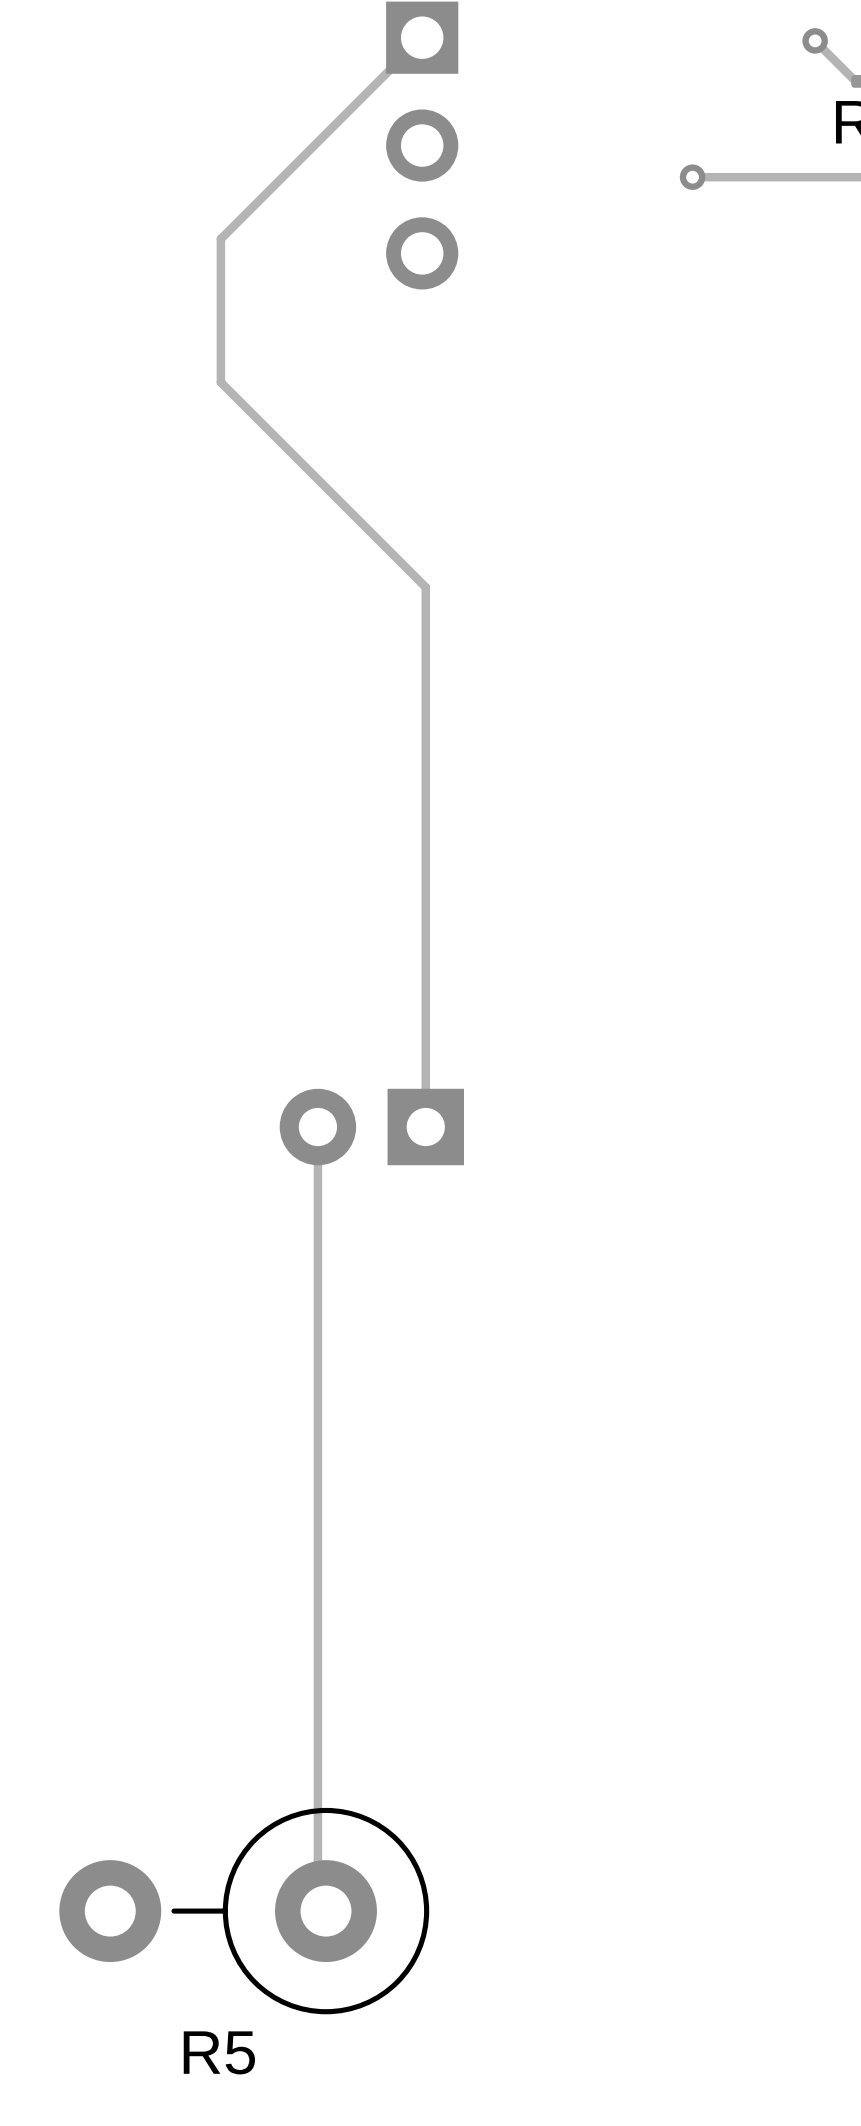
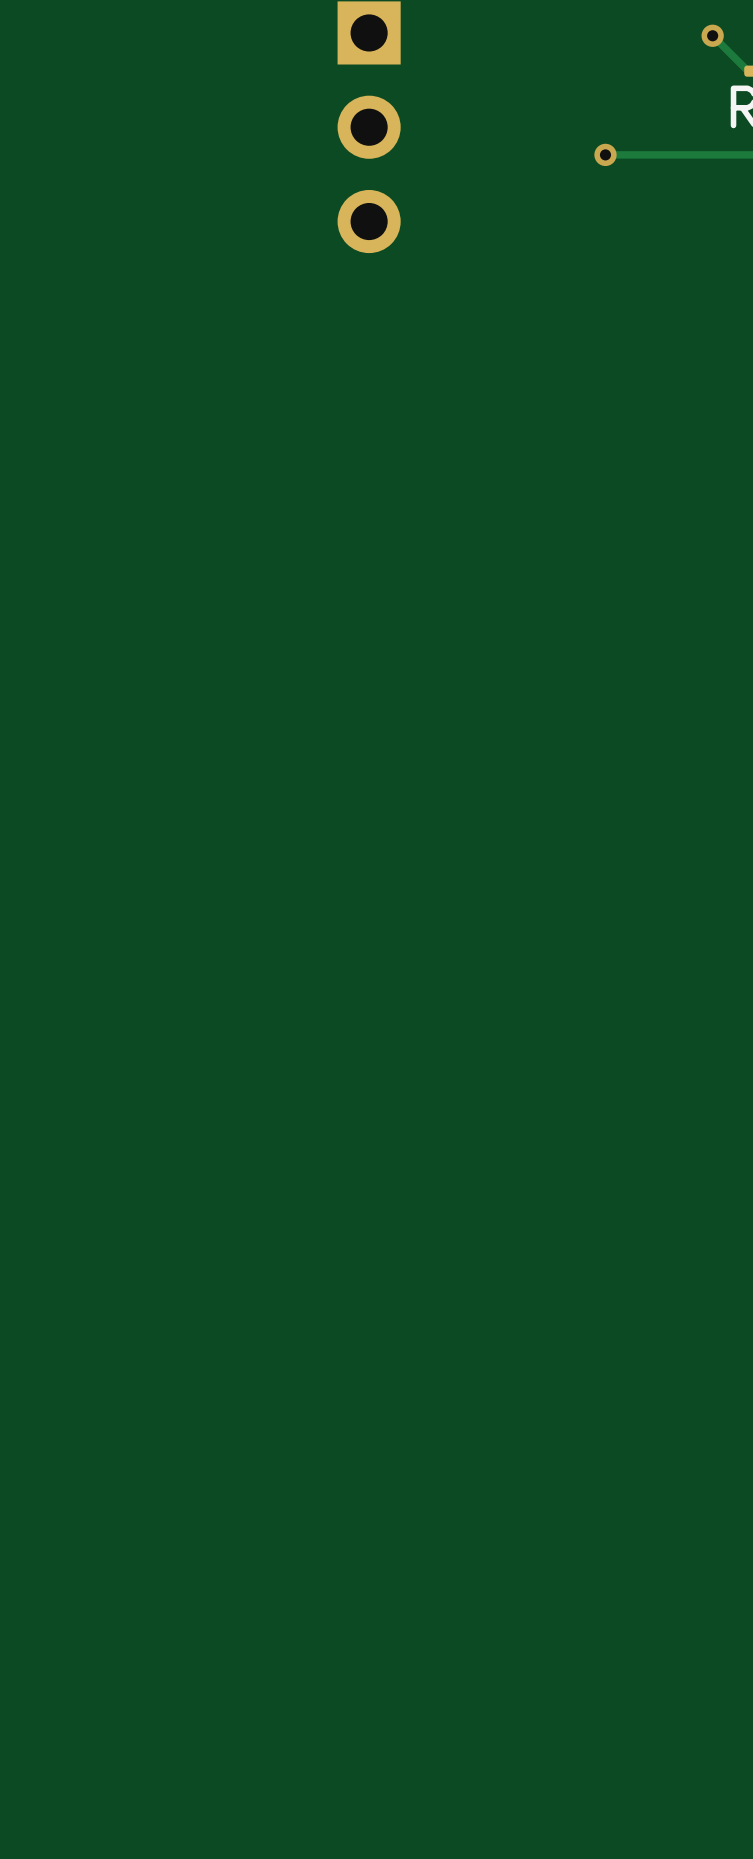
track: (422, 37) (220, 239) (220, 382) (425, 587) (425, 1127) -> none
track: (317, 1127) (317, 1903) (325, 1911) -> none
part: (371, 1127) -> none
R5: (244, 1911) -> none

